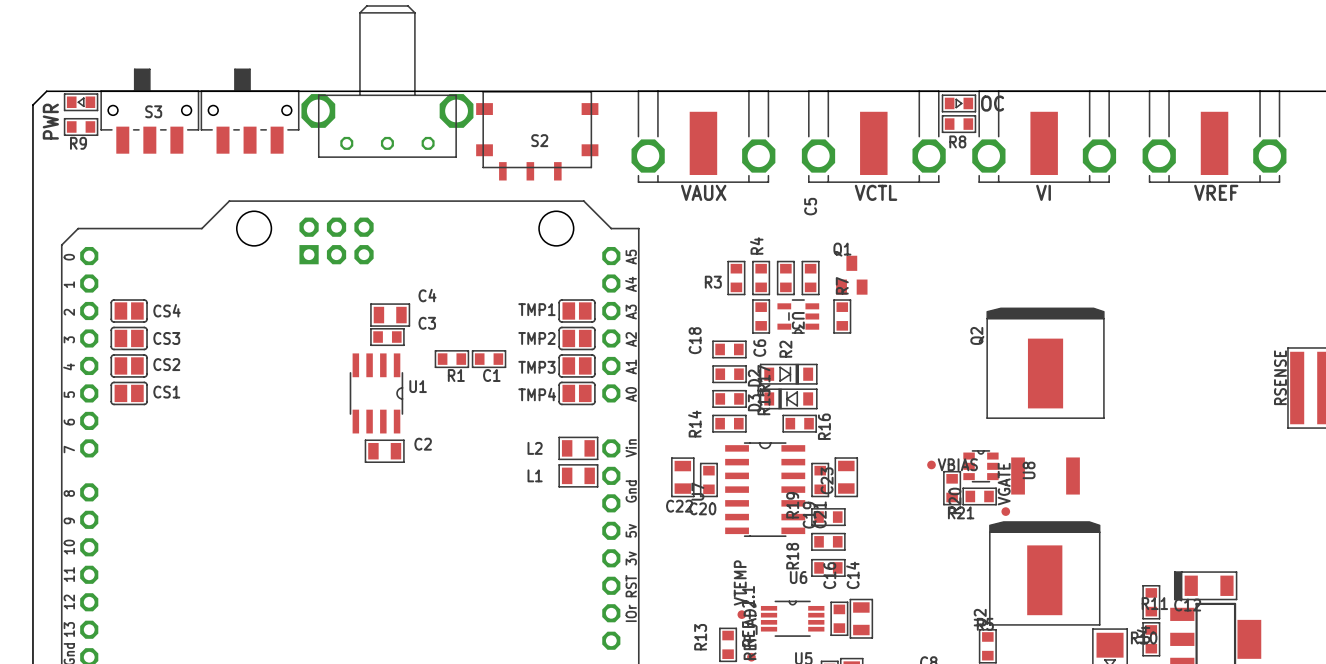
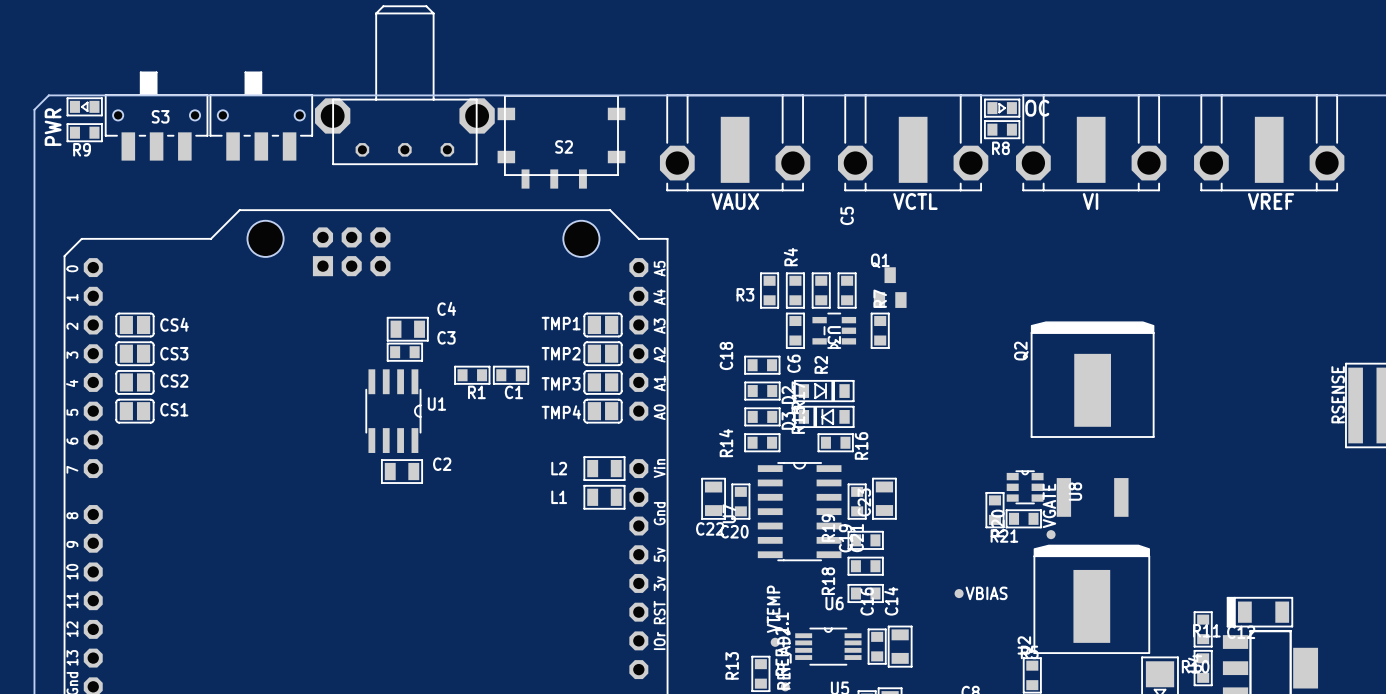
VBIAS position: (931, 464) -> (959, 593)

